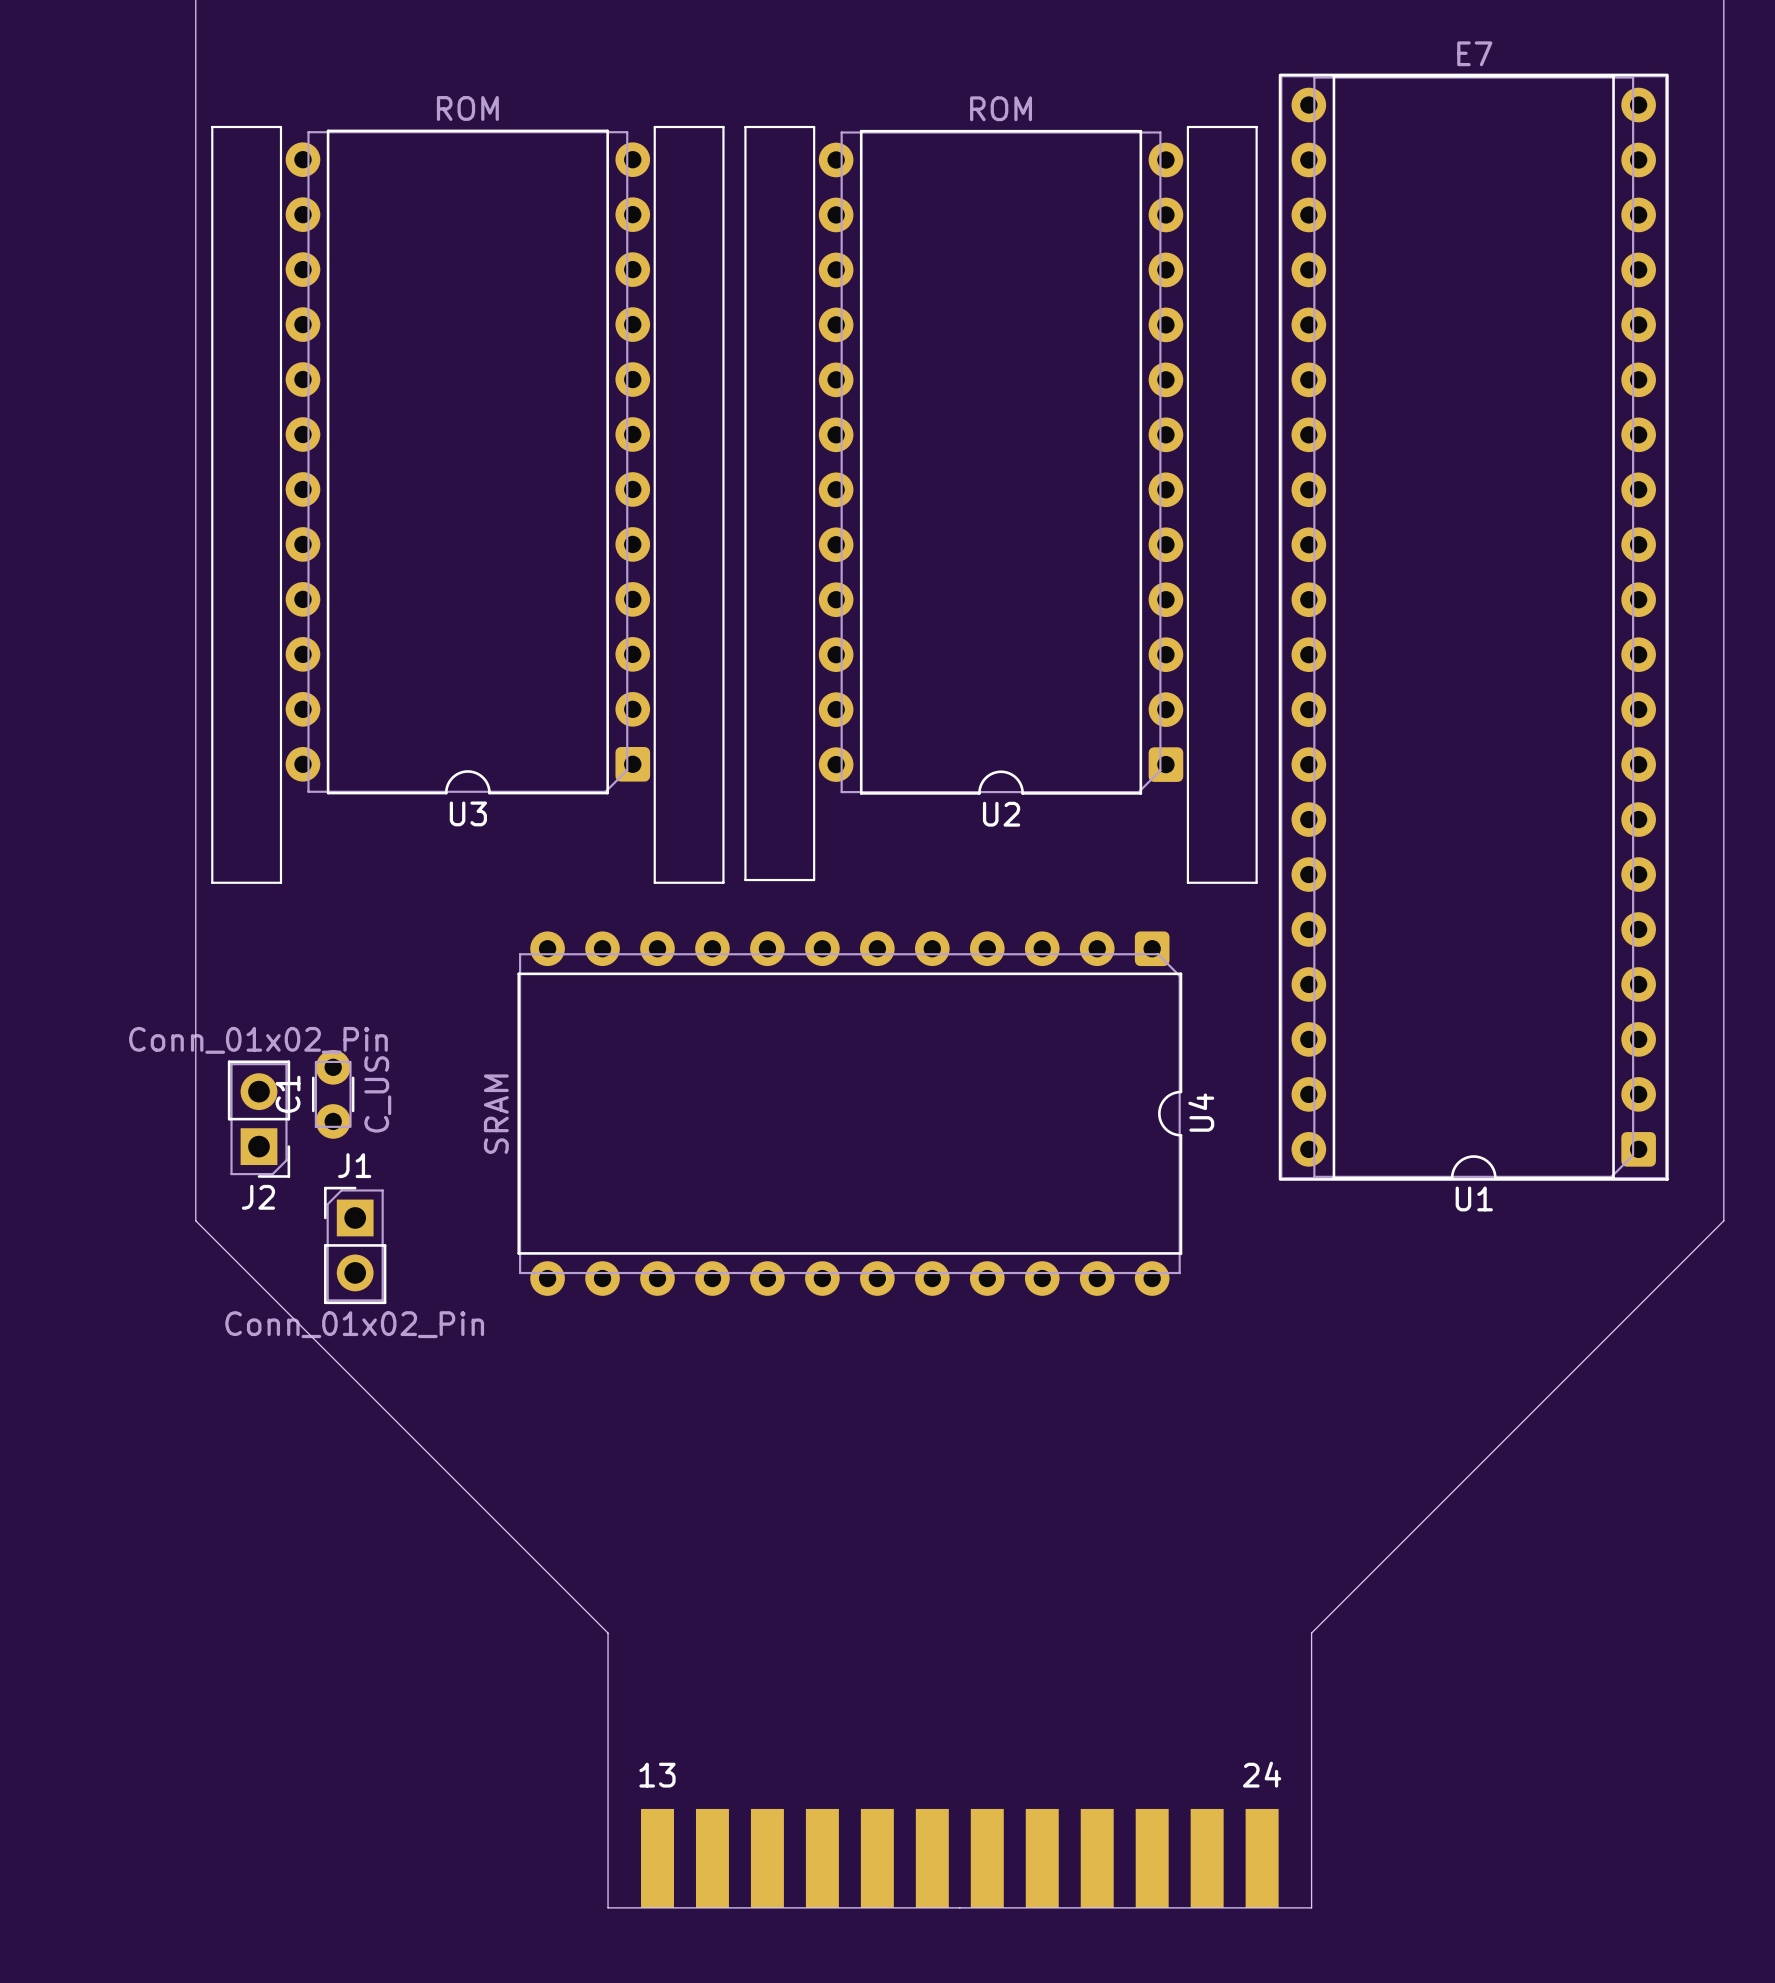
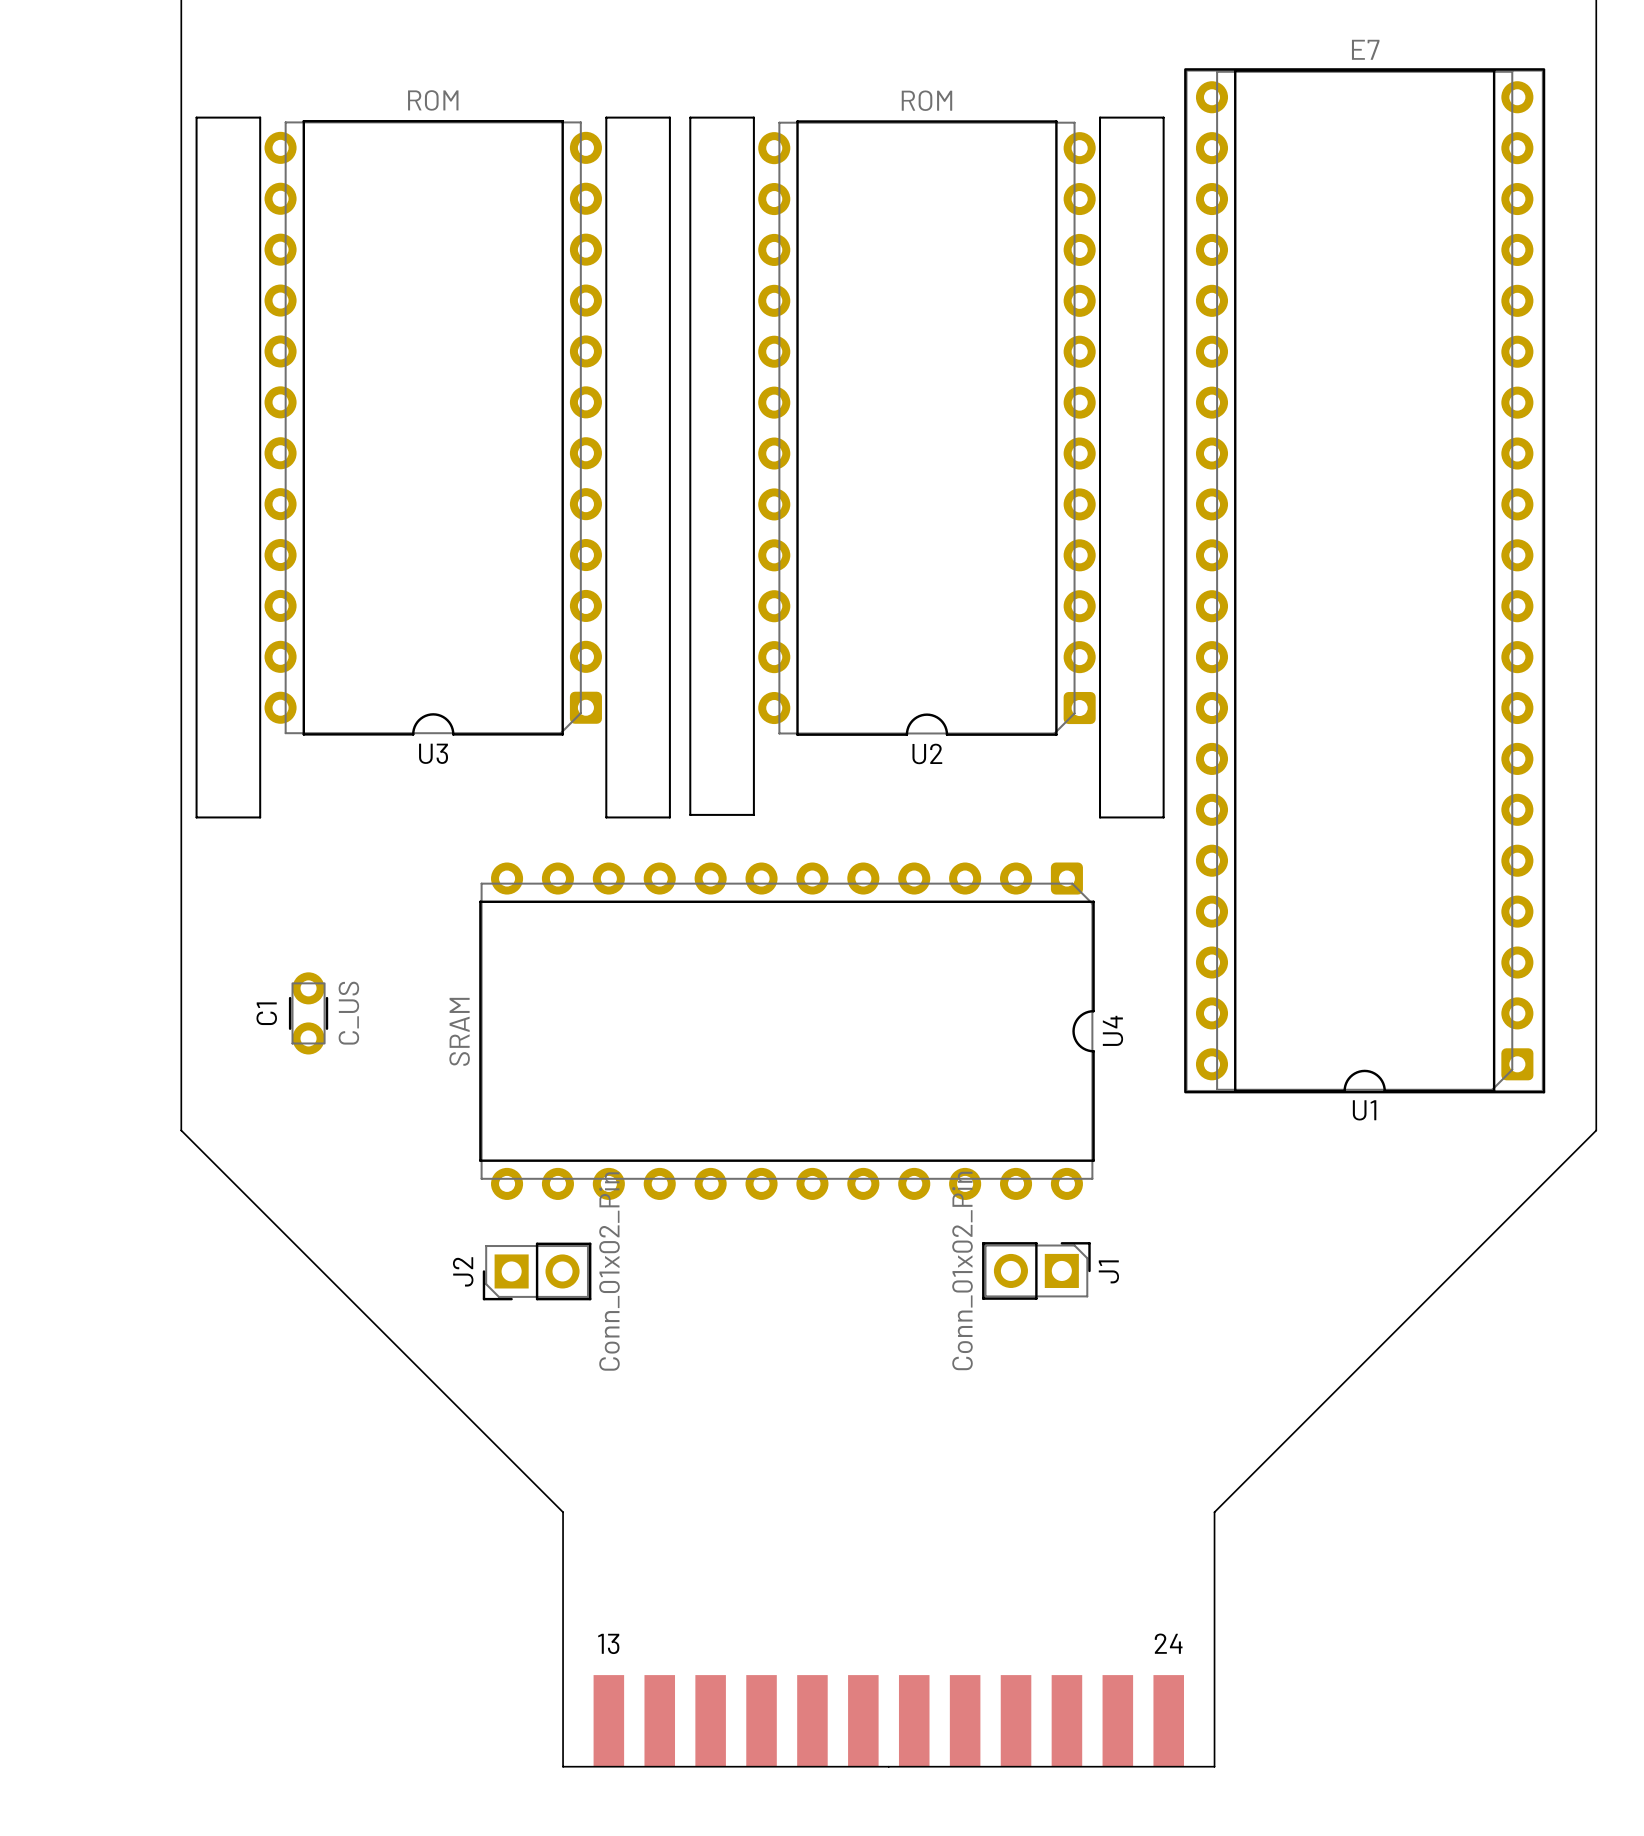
J2 rotation: 0° (259, 1119) -> 90° clockwise (537, 1271)
J2 position: (259, 1119) -> (537, 1271)
J1 rotation: 0° (355, 1245) -> 90° clockwise (1036, 1270)
J1 position: (355, 1245) -> (1036, 1270)

